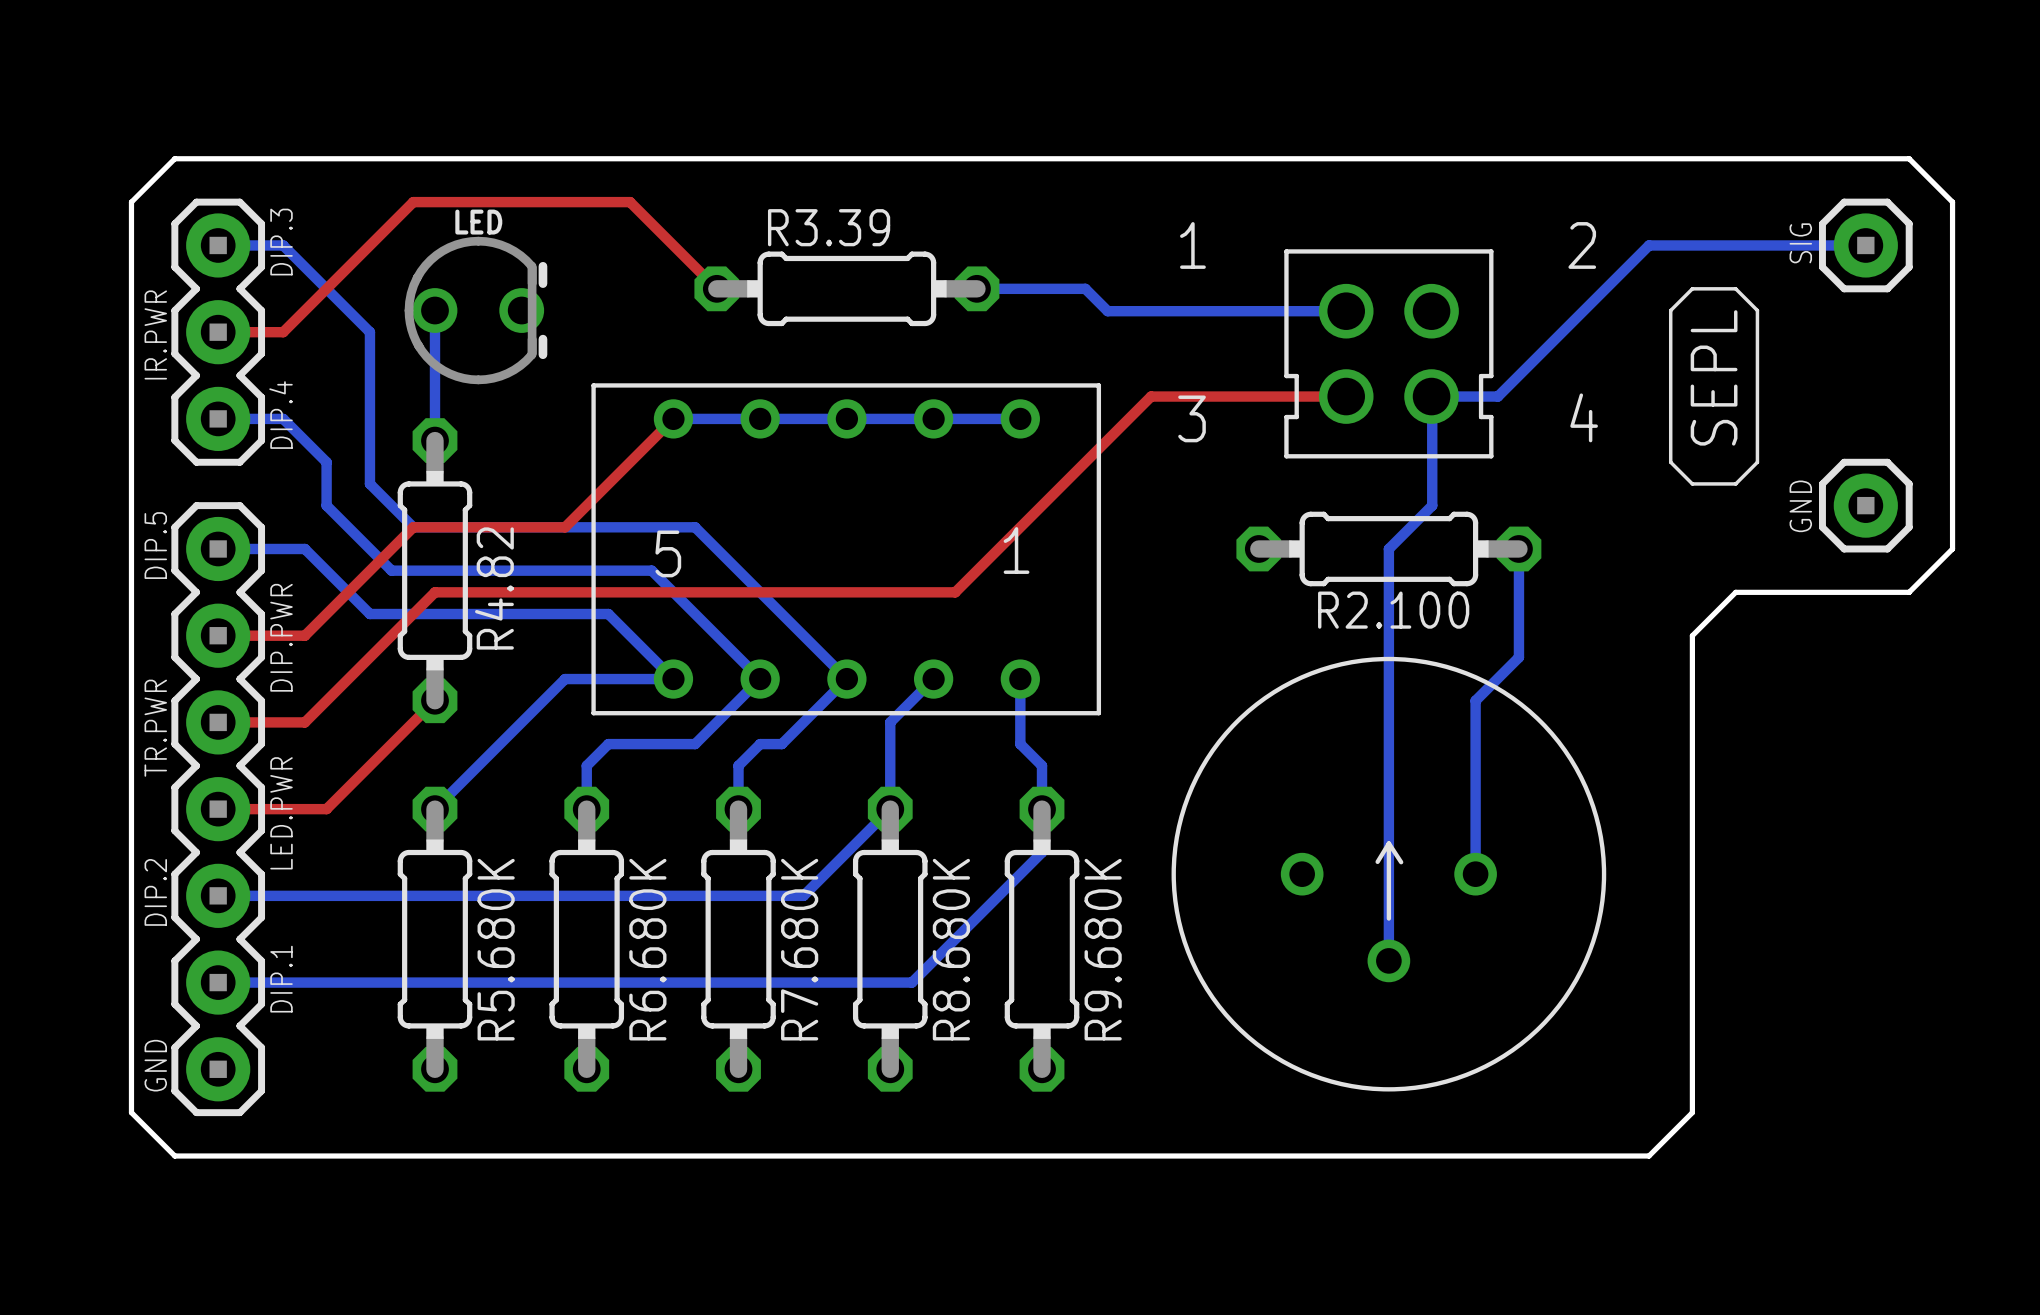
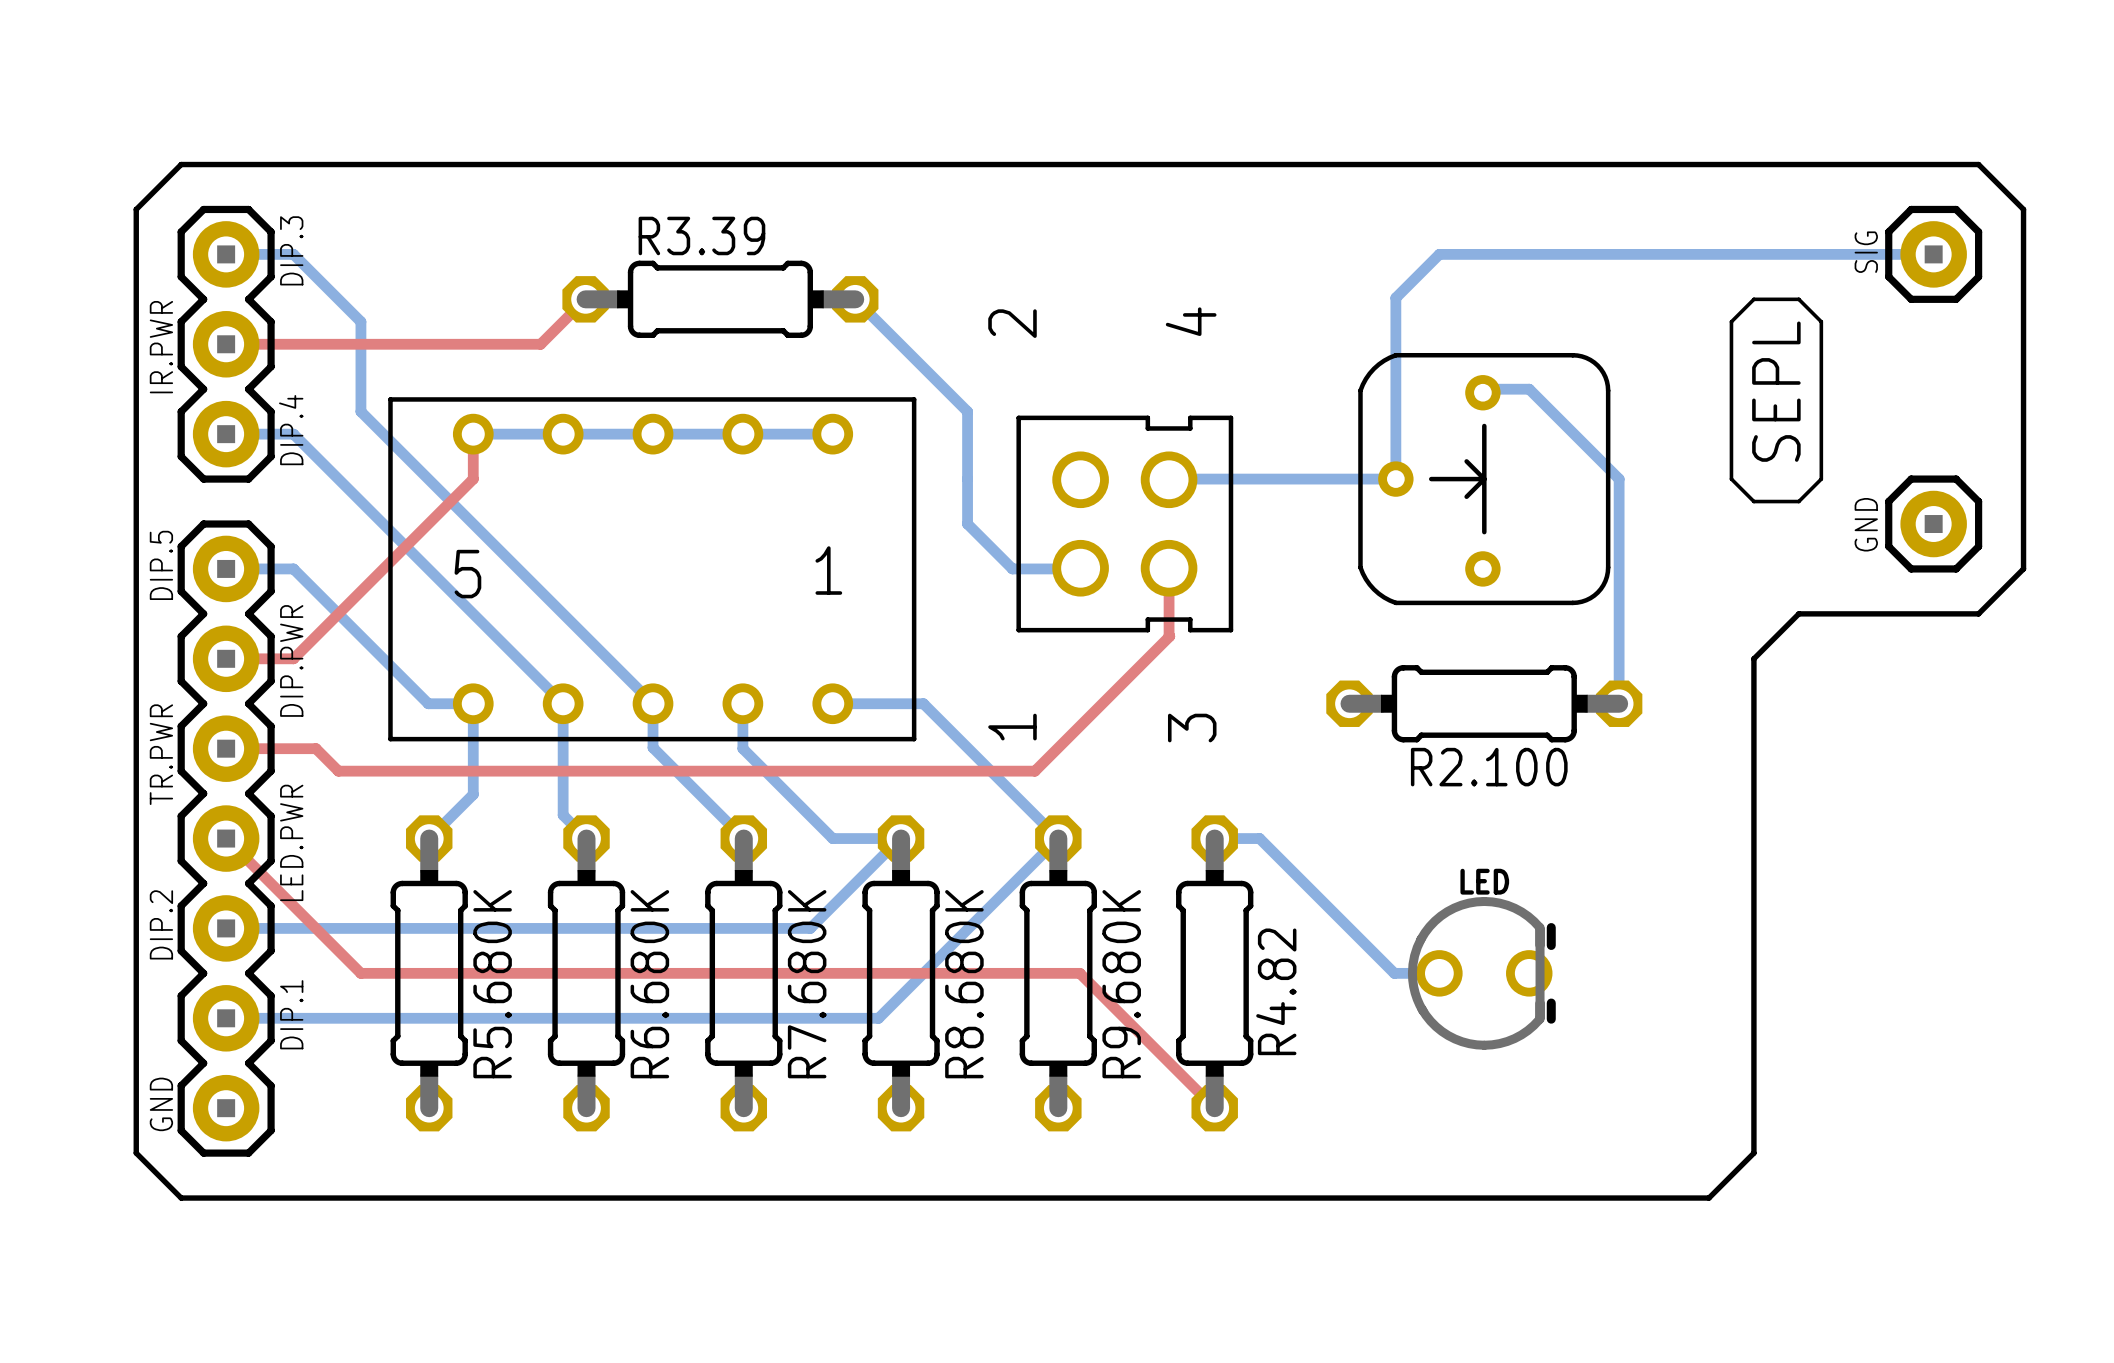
bottom track: (1649, 245) (1497, 396) (1431, 396) -> (1708, 254) (1439, 254) (1395, 297) (1395, 479) (1169, 479)
top track: (716, 288) (630, 202) (413, 202) (283, 332) -> (585, 299) (540, 344) (293, 344)
bottom track: none -> (855, 299) (967, 411) (967, 524) (1012, 568) (1080, 568)
R3.39 position: (846, 288) -> (720, 299)
bottom track: (976, 288) (1085, 288) (1107, 311) (1346, 311) -> none
bottom track: (348, 310) (369, 332) (369, 483) (413, 527) (695, 527) (846, 679) (781, 744) (760, 744) (738, 765) (738, 809) -> (360, 321) (360, 411) (653, 703) (653, 747) (743, 838)
bottom track: (434, 310) (434, 440) -> none
LED: (475, 310) -> none
part rotation: 0° (1388, 353) -> 90° counterclockwise (1124, 524)
part position: (1388, 353) -> (1124, 524)
bottom track: none -> (1482, 392) (1486, 389) (1529, 389) (1619, 479) (1619, 703)
top track: (1346, 396) (1151, 396) (955, 592) (434, 592) (304, 722) -> (1169, 568) (1169, 636) (1034, 771) (338, 771) (316, 748)
bottom track: (1432, 396) (1432, 505) (1388, 548) (1388, 960) -> none
top track: (673, 418) (565, 527) (413, 527) (304, 635) (283, 635) -> (473, 434) (473, 479) (293, 658)
bottom track: (803, 418) (1020, 418) -> (473, 434) (697, 434)
bottom track: (326, 462) (326, 505) (391, 570) (651, 570) (760, 679) (695, 744) (608, 744) (586, 765) (586, 809) -> (338, 479) (563, 703) (563, 815) (586, 838)
part: none -> (1484, 479)
bottom track: (283, 548) (304, 548) (369, 614) (608, 614) (673, 679) (565, 679) (434, 809) -> (293, 568) (428, 703) (473, 703) (473, 794) (429, 838)
R2.100 position: (1388, 548) -> (1484, 703)
bottom track: (1518, 548) (1518, 657) (1475, 700) (1475, 874) -> none
part position: (846, 549) -> (652, 569)
R4.82 position: (434, 570) -> (1214, 973)
bottom track: none -> (742, 703) (742, 748) (832, 838) (901, 838)
bottom track: (933, 679) (890, 722) (890, 809) (803, 895) (781, 895) -> (900, 838) (810, 928)
bottom track: (1020, 679) (1020, 744) (1042, 765) (1042, 852) (911, 982) (847, 982) -> (832, 703) (923, 703) (1058, 838) (878, 1018)
top track: (434, 700) (326, 809) (218, 809) -> (1214, 1108) (1079, 973) (360, 973) (226, 838)
bottom track: none -> (1214, 838) (1259, 838) (1394, 973) (1439, 973)
part: (1388, 874) -> none
R5.680K position: (434, 939) -> (429, 973)
R6.680K position: (586, 939) -> (586, 973)
R7.680K position: (738, 939) -> (743, 973)
R8.680K position: (890, 939) -> (901, 973)
R9.680K position: (1042, 939) -> (1058, 973)
LED: none -> (1481, 973)

